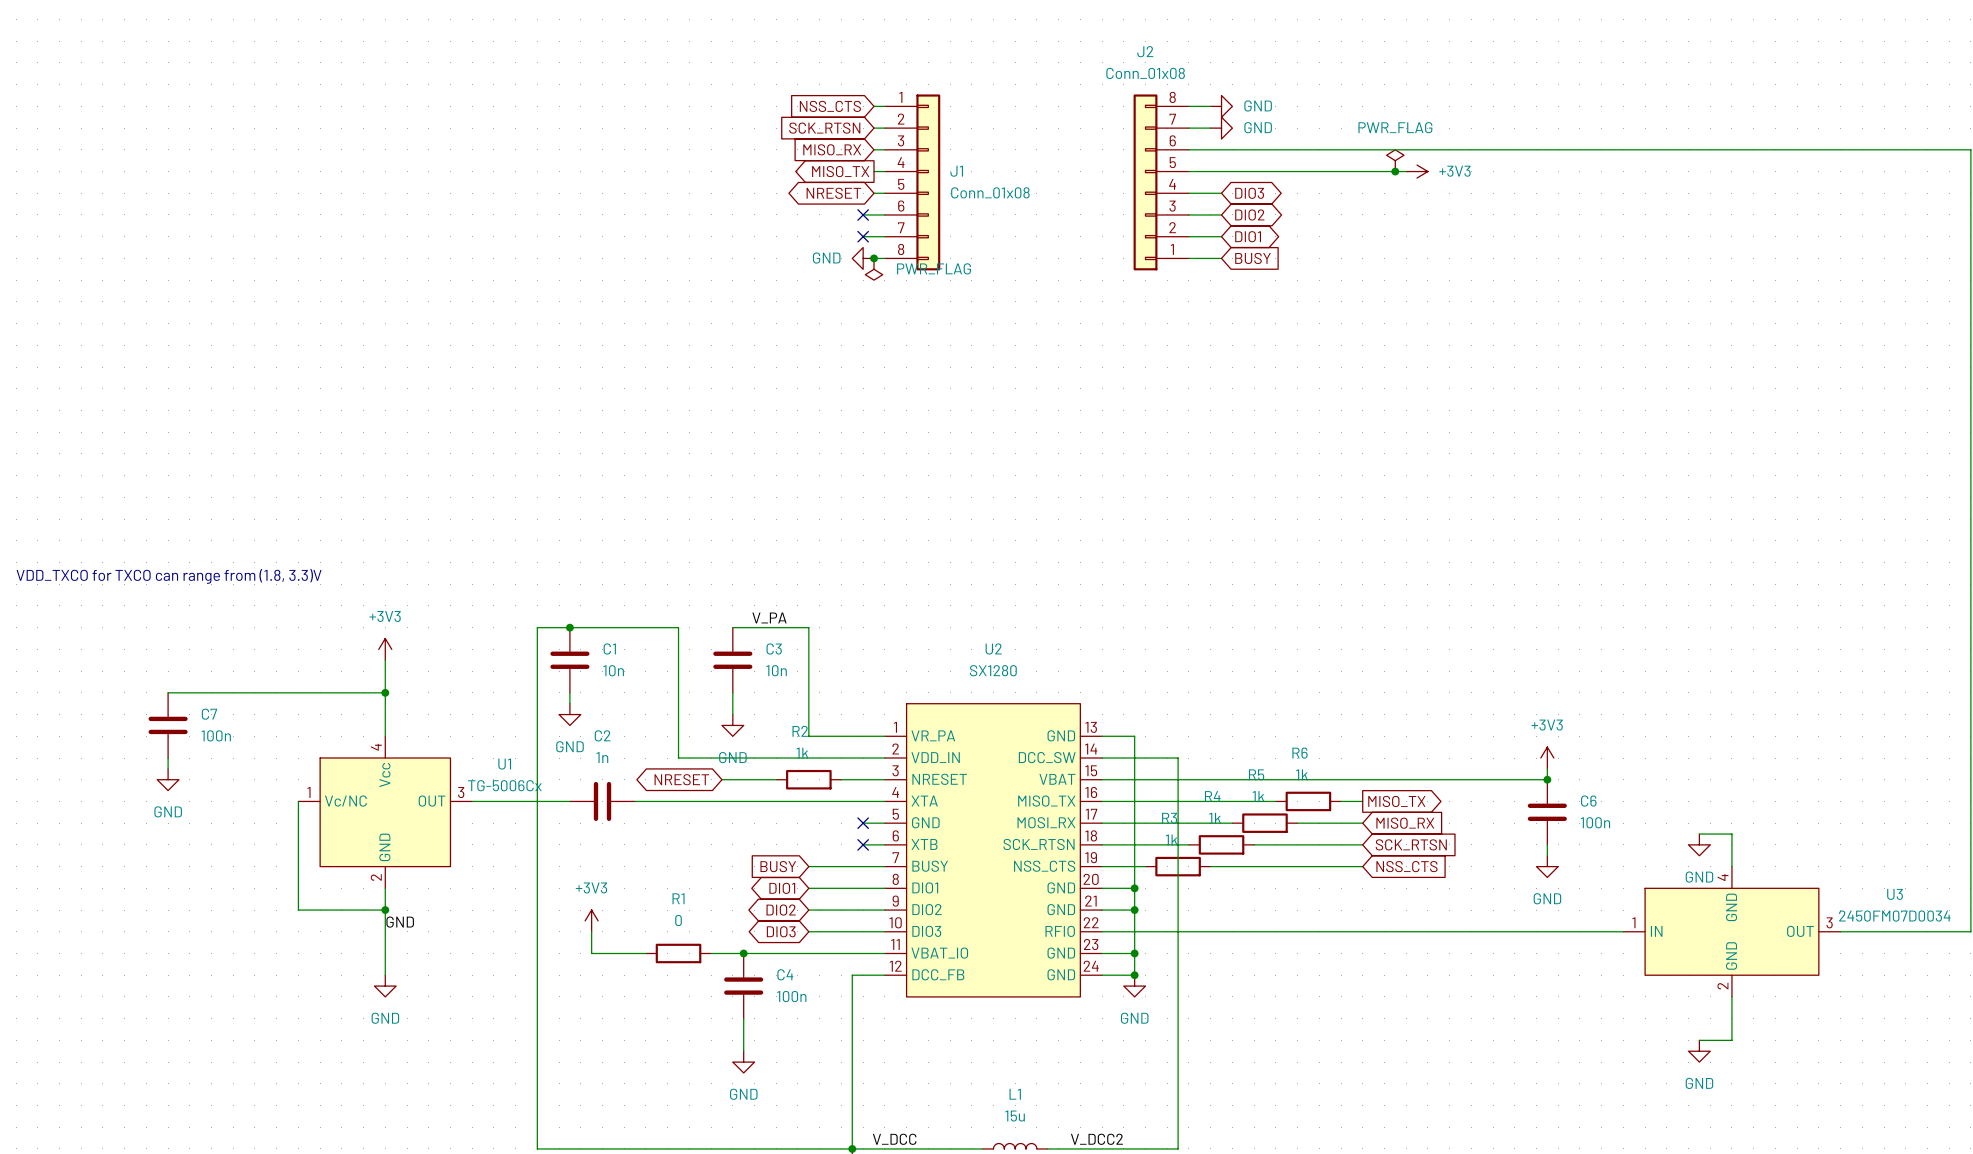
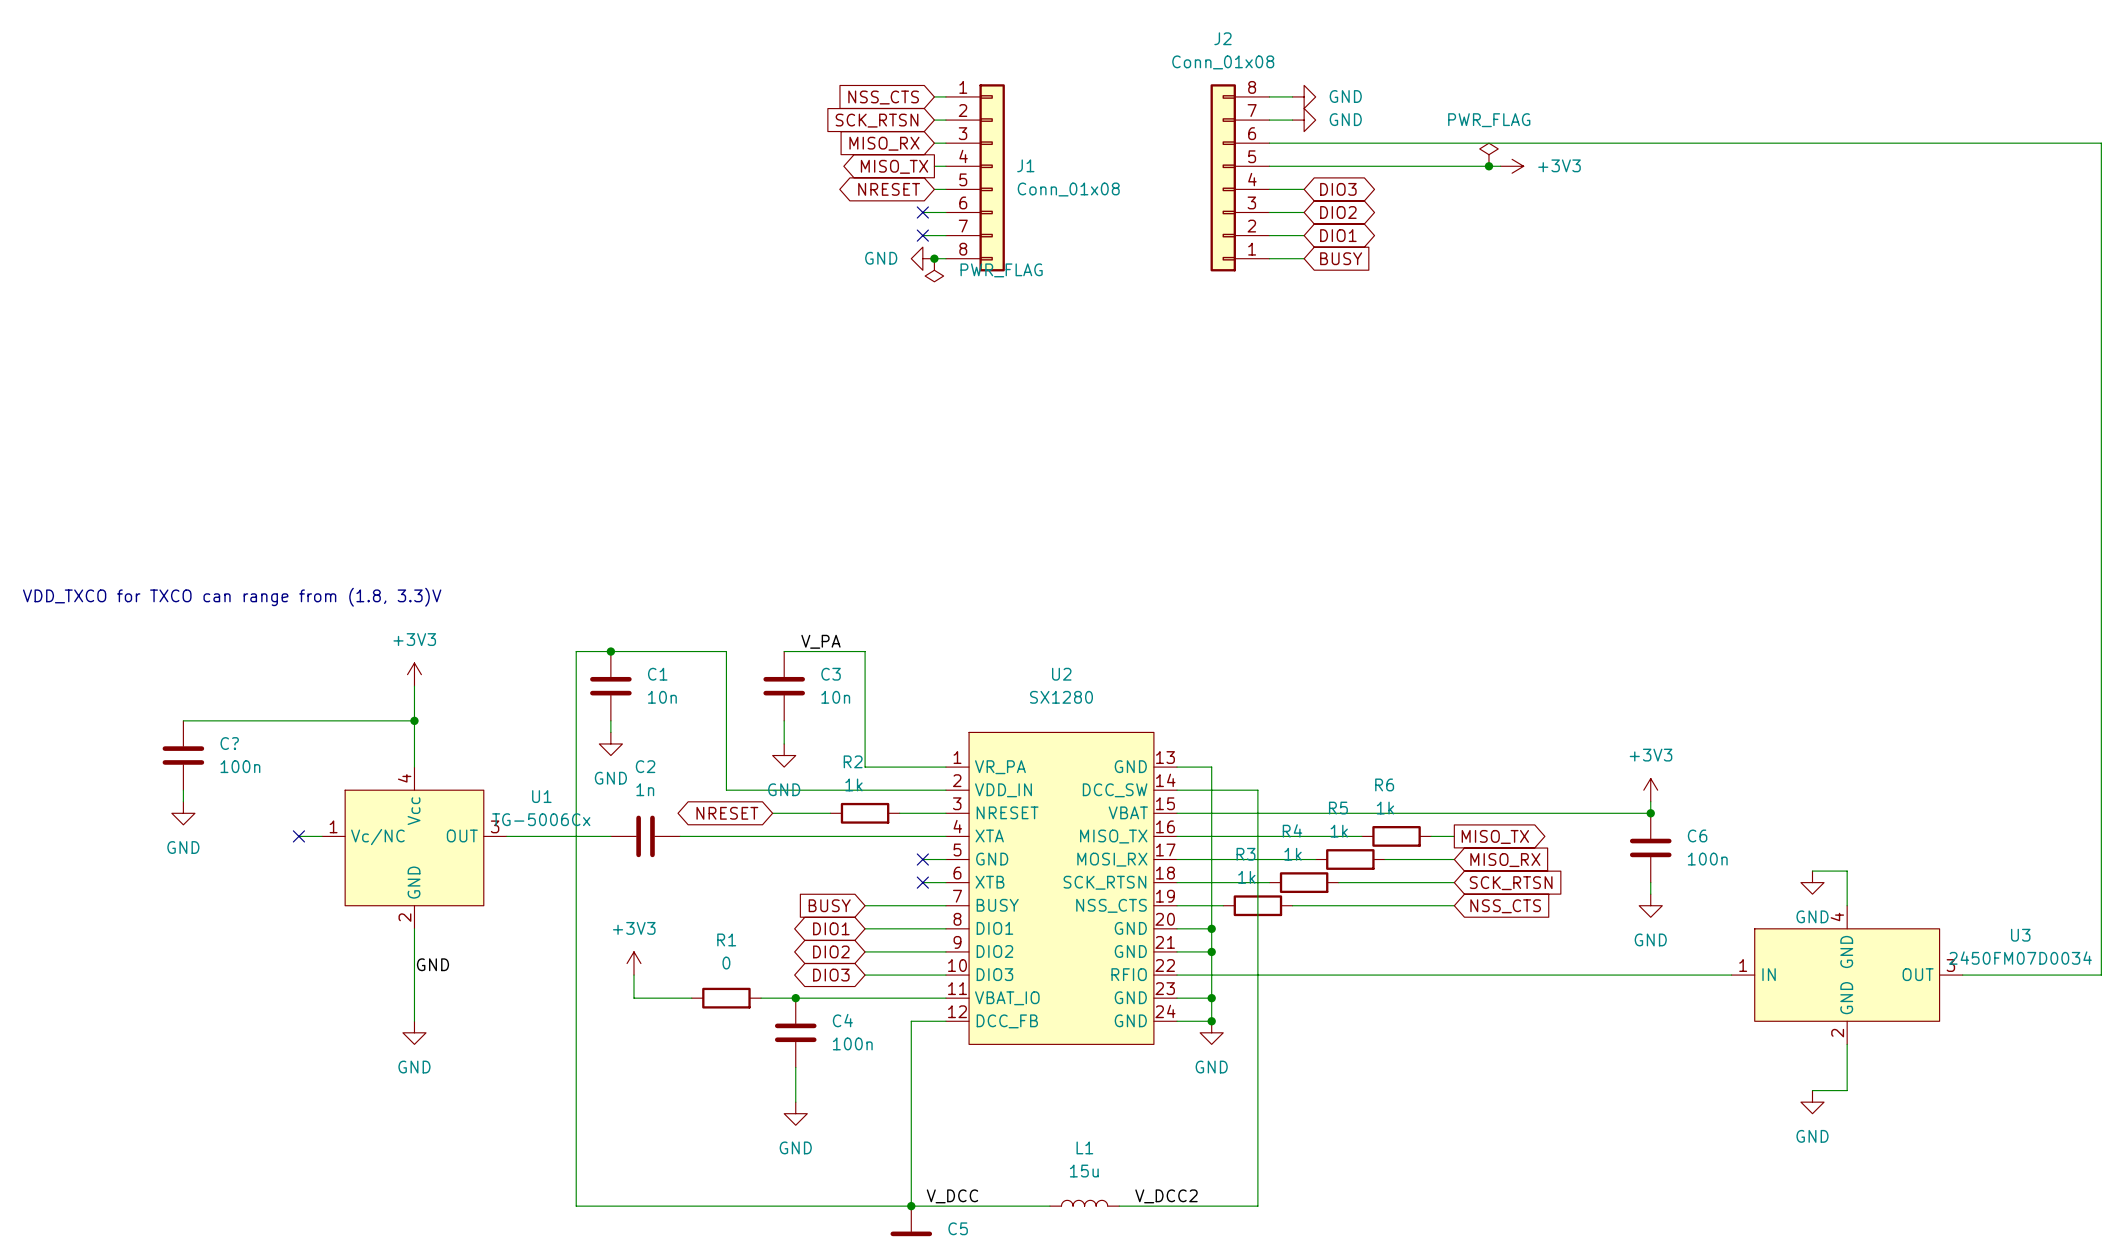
C7 name: C7 (209, 714) -> C? (229, 743)
no-connect mark: none -> (298, 836)
wire: (298, 801) (298, 910) (385, 910) -> (322, 836) (298, 836)
junction: (385, 910) -> none

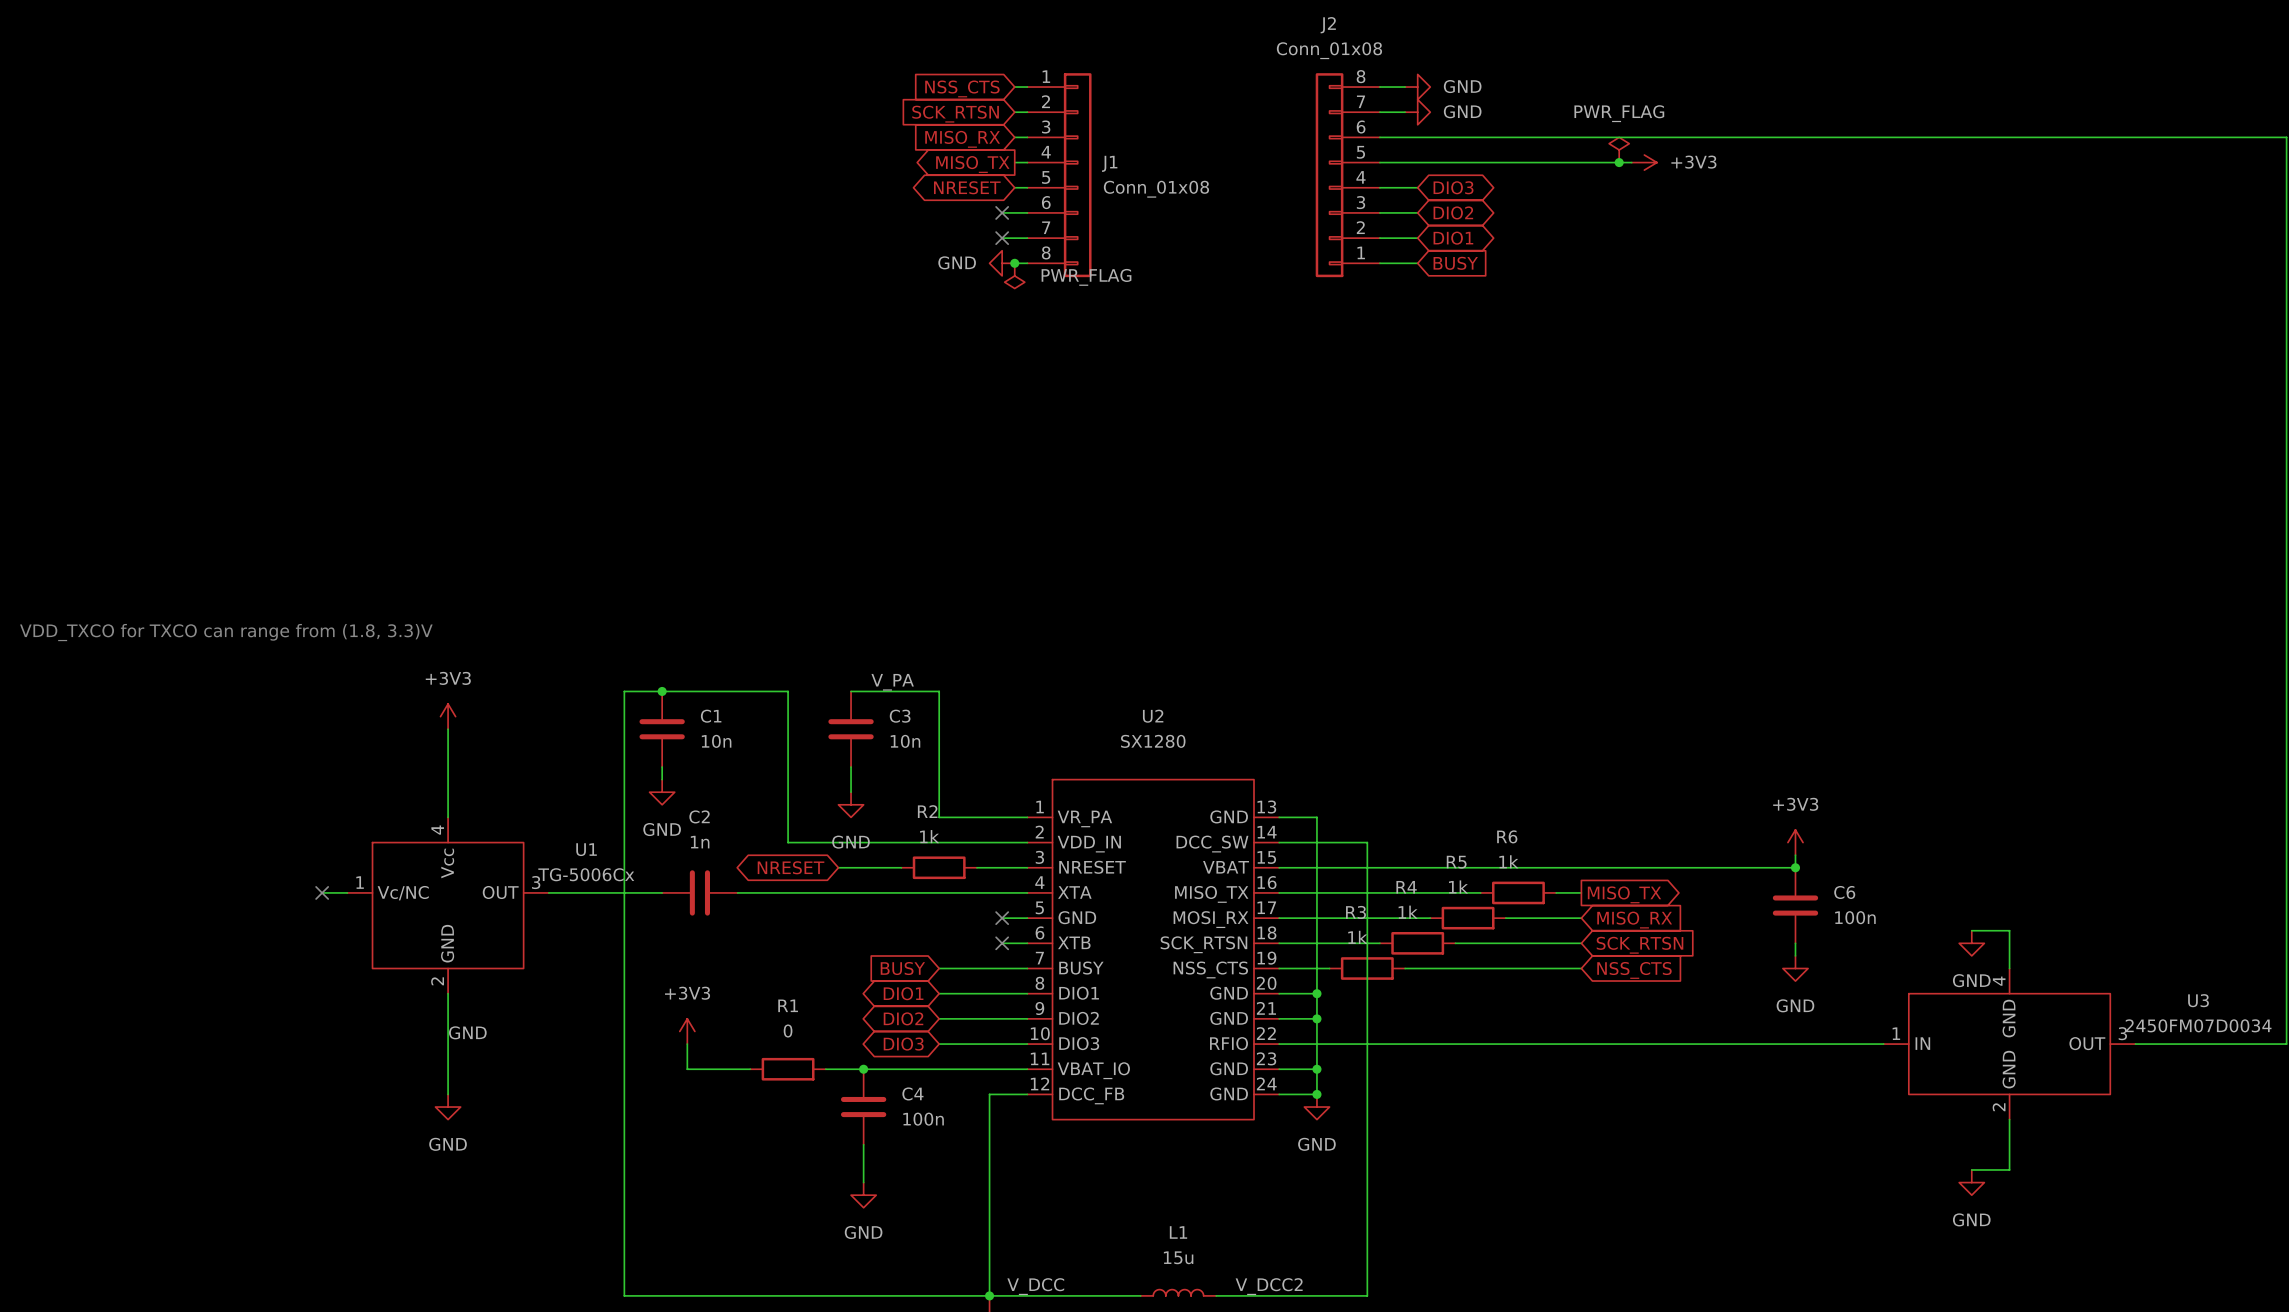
wire: (183, 720) (414, 720) -> none
junction: (414, 720) -> none
C?: 100n (183, 755) -> none
wire: (183, 790) (183, 801) -> none
power symbol: GND (183, 813) -> none

